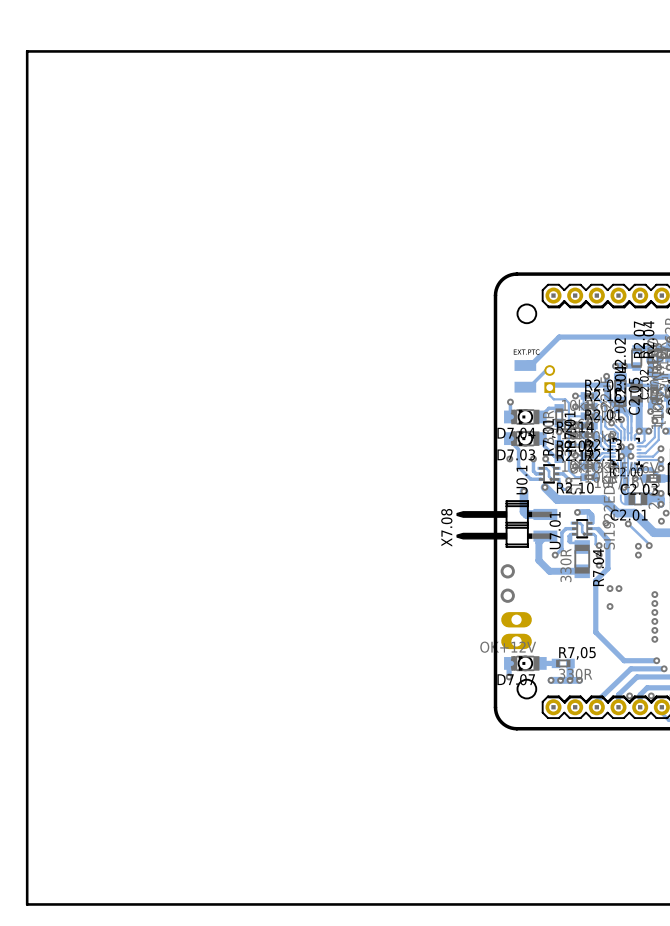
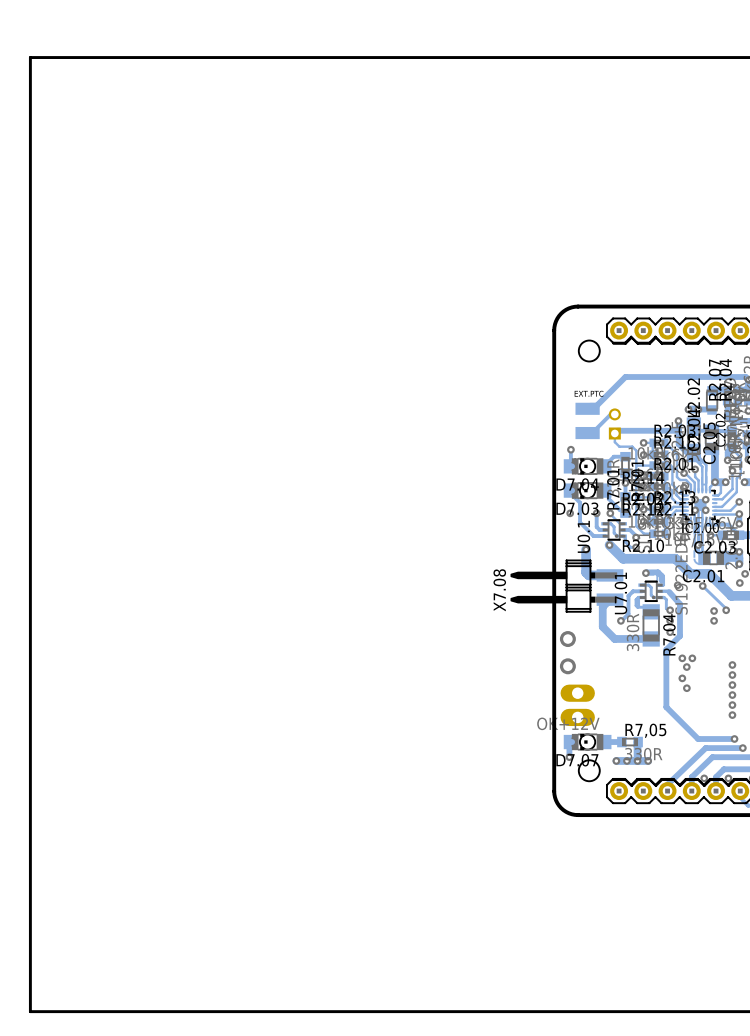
via: none -> (686, 667)
via: none -> (686, 688)

